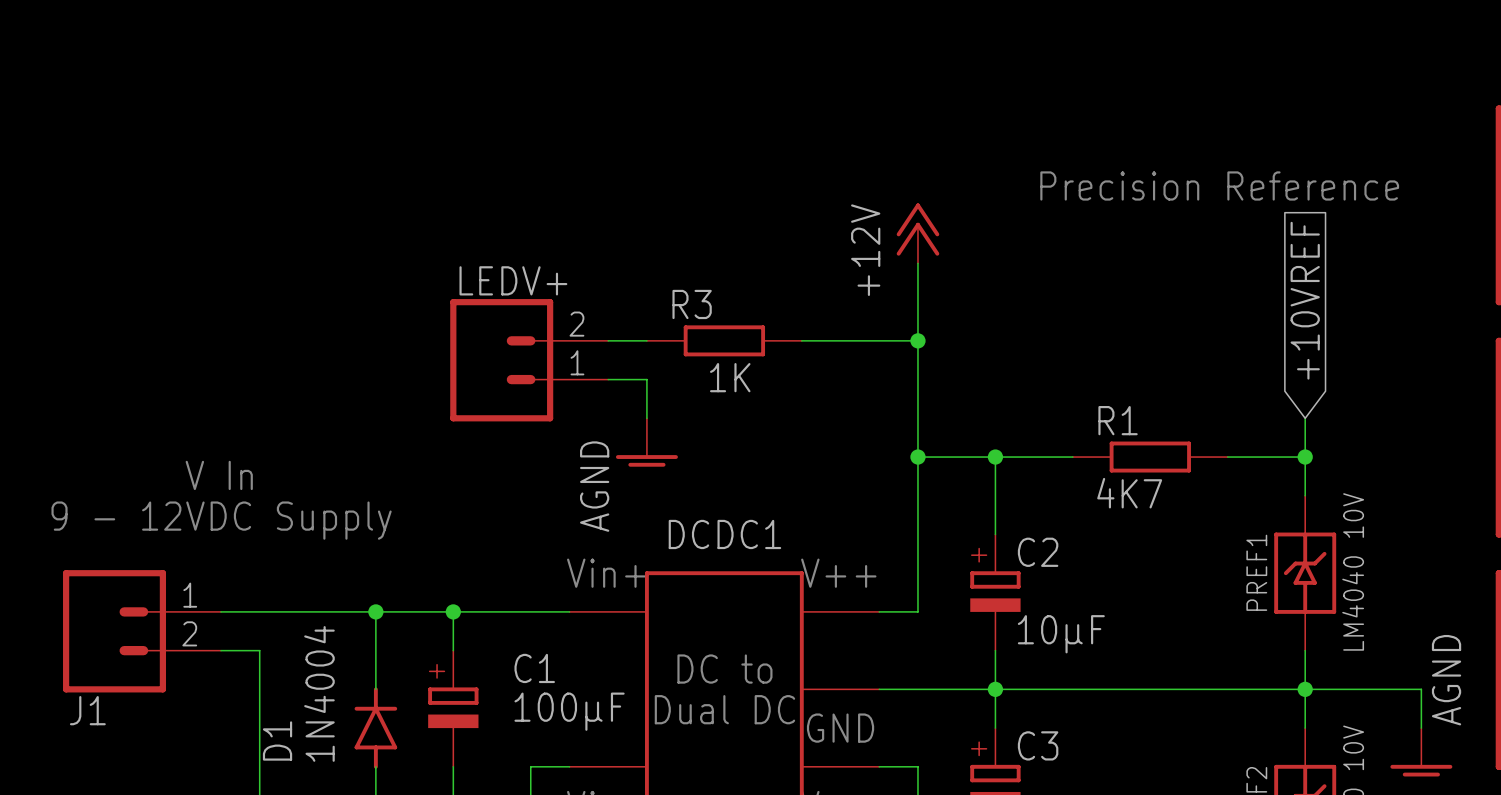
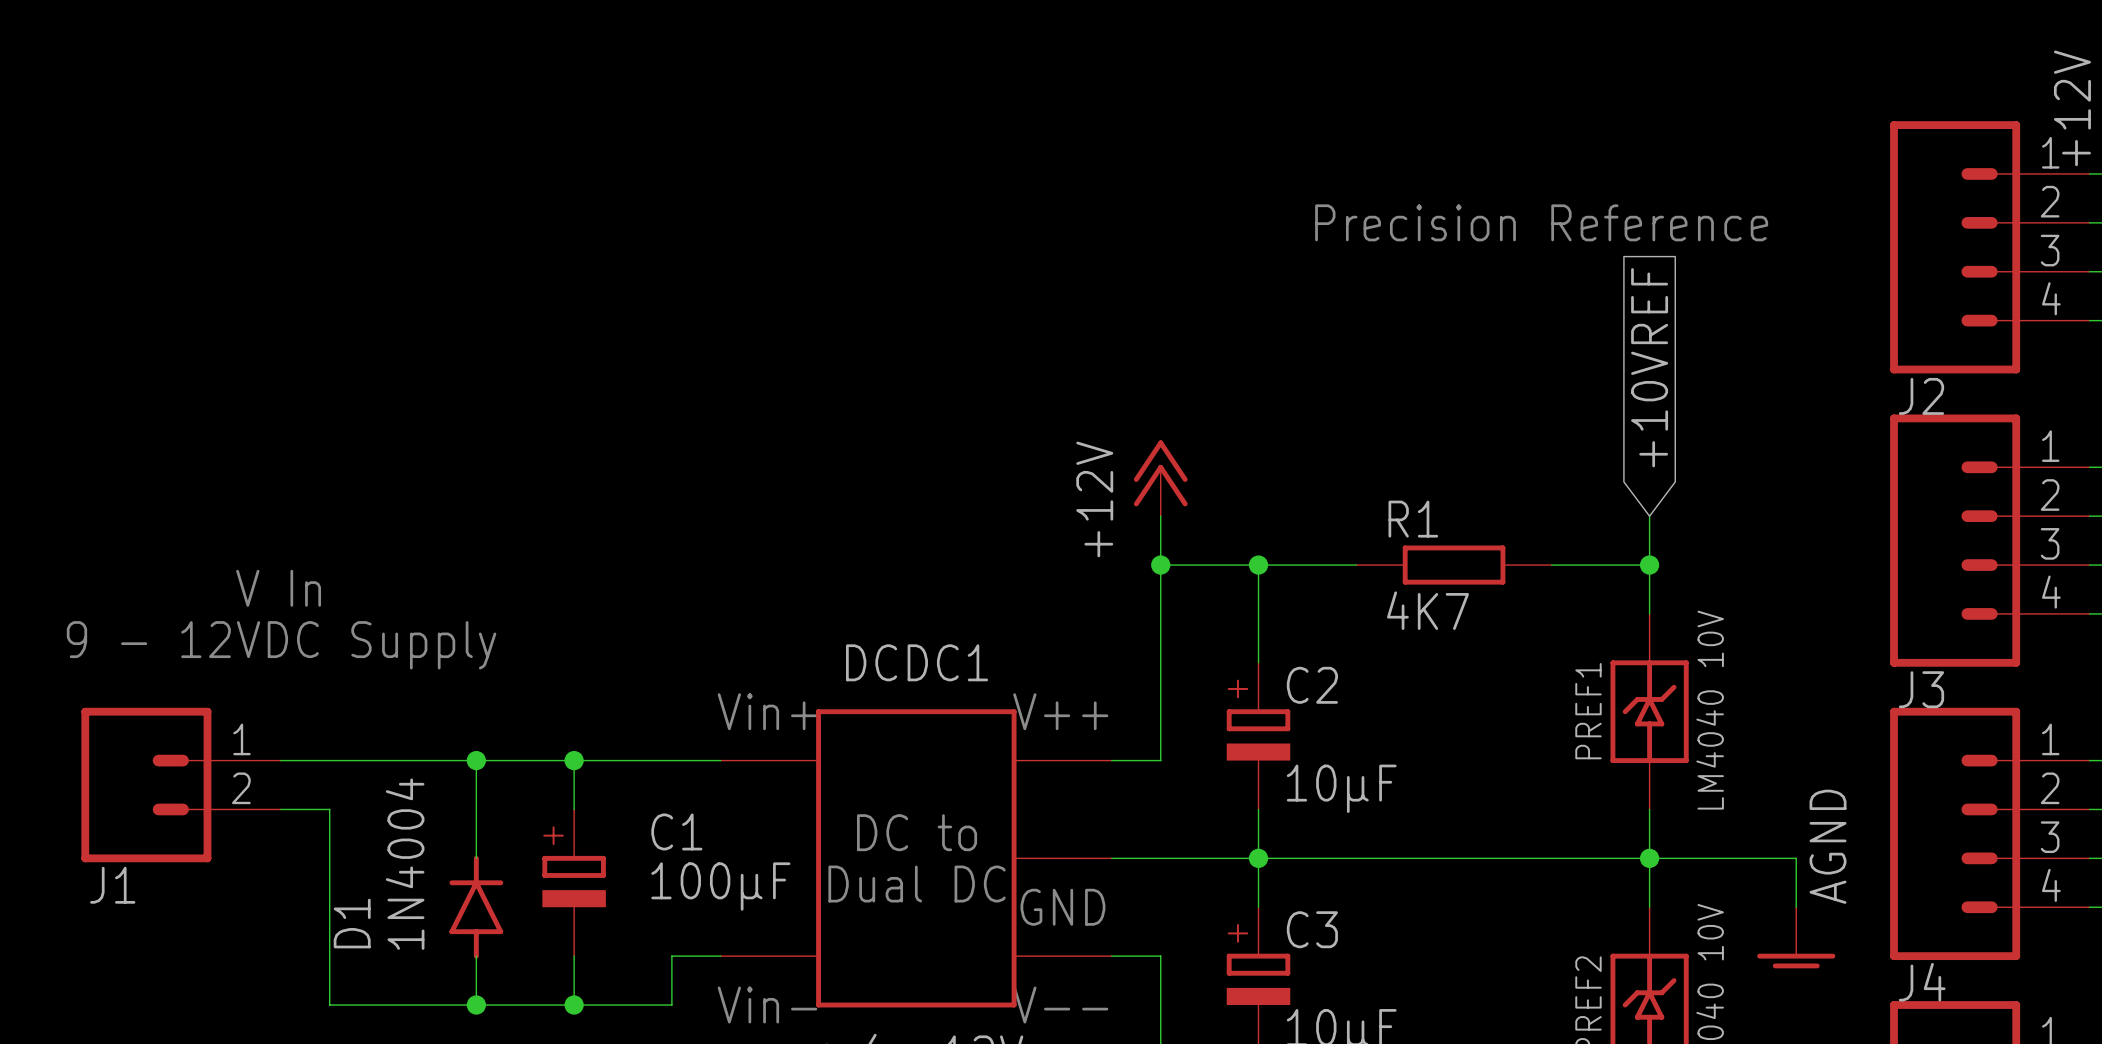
power symbol position: +12V (917, 233) -> +12V (1160, 478)
wire: (917, 263) (917, 418) -> none
wire: (608, 340) (646, 340) -> none
R3: 1K (724, 340) -> none
wire: (801, 340) (917, 340) -> none
junction: (917, 340) -> none
LEDV+: (529, 360) -> none
wire: (608, 379) (646, 379) (646, 418) -> none
power symbol: AGND (646, 442) -> none

